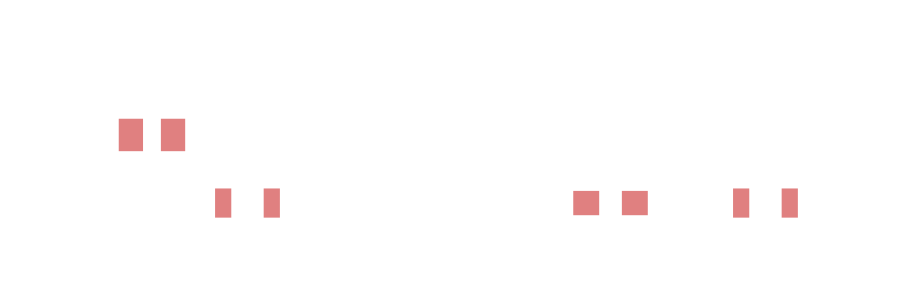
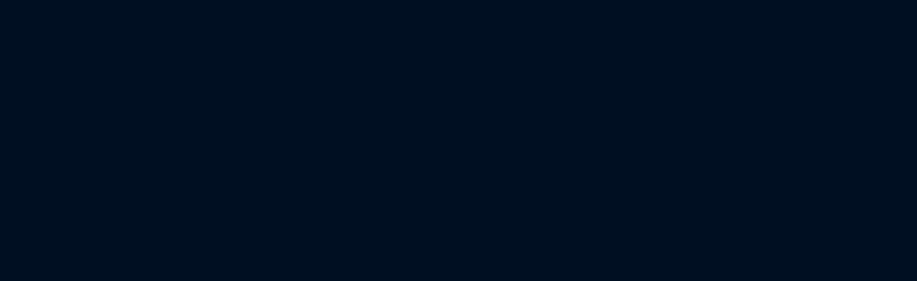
part: (151, 134) -> none
part: (247, 203) -> none
part: (610, 203) -> none
part: (765, 203) -> none

